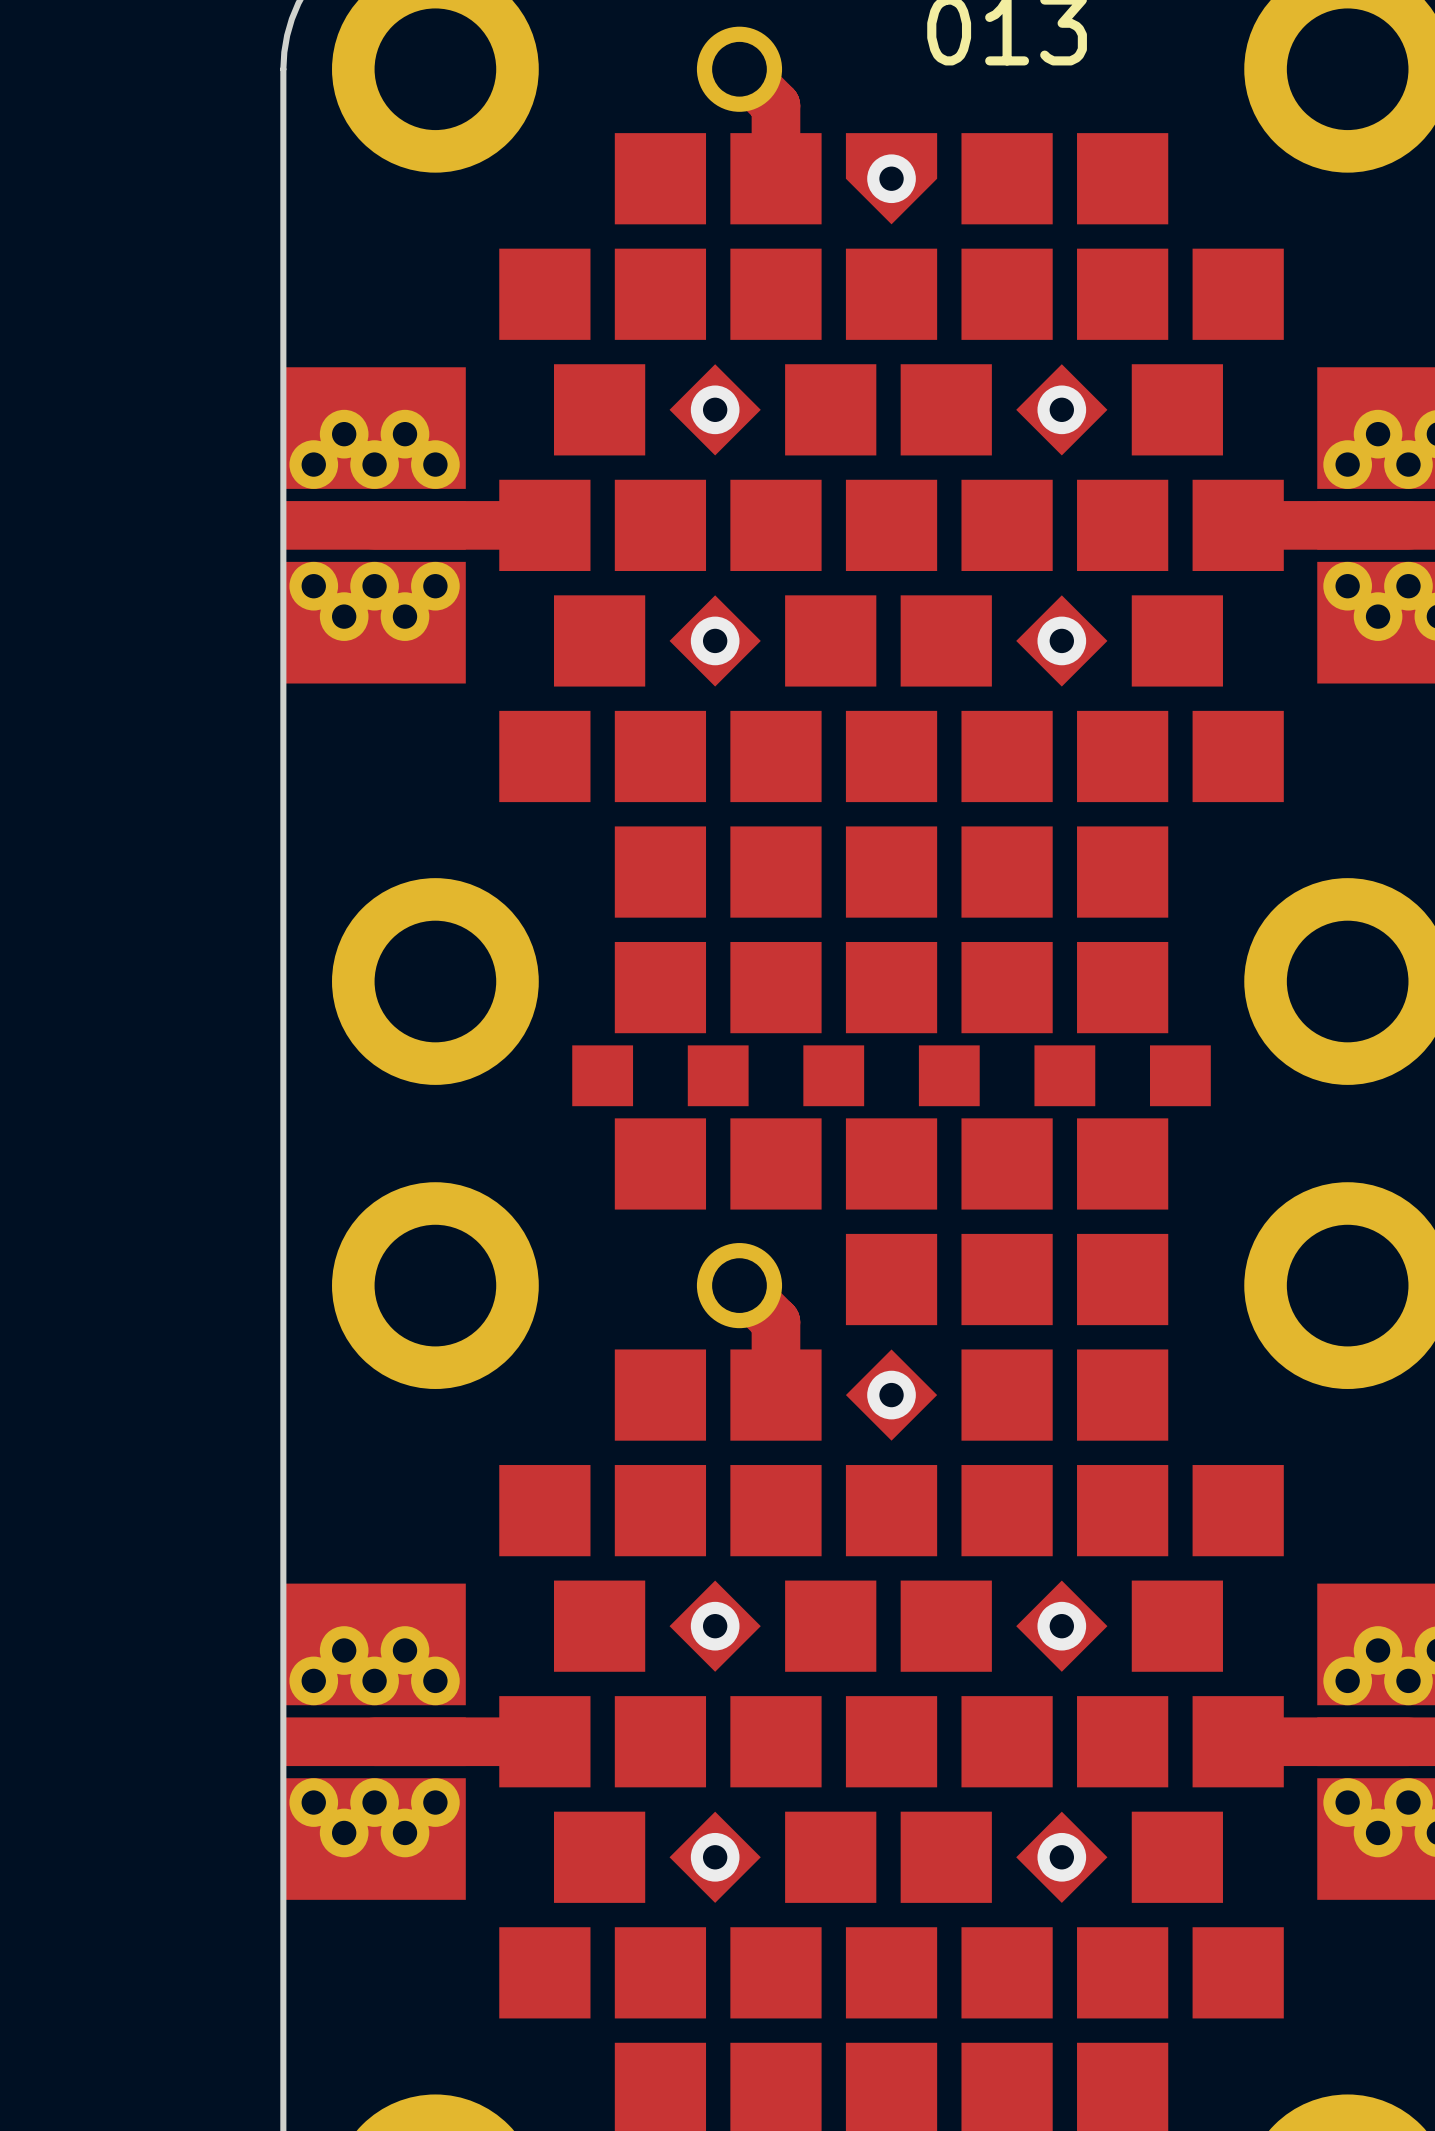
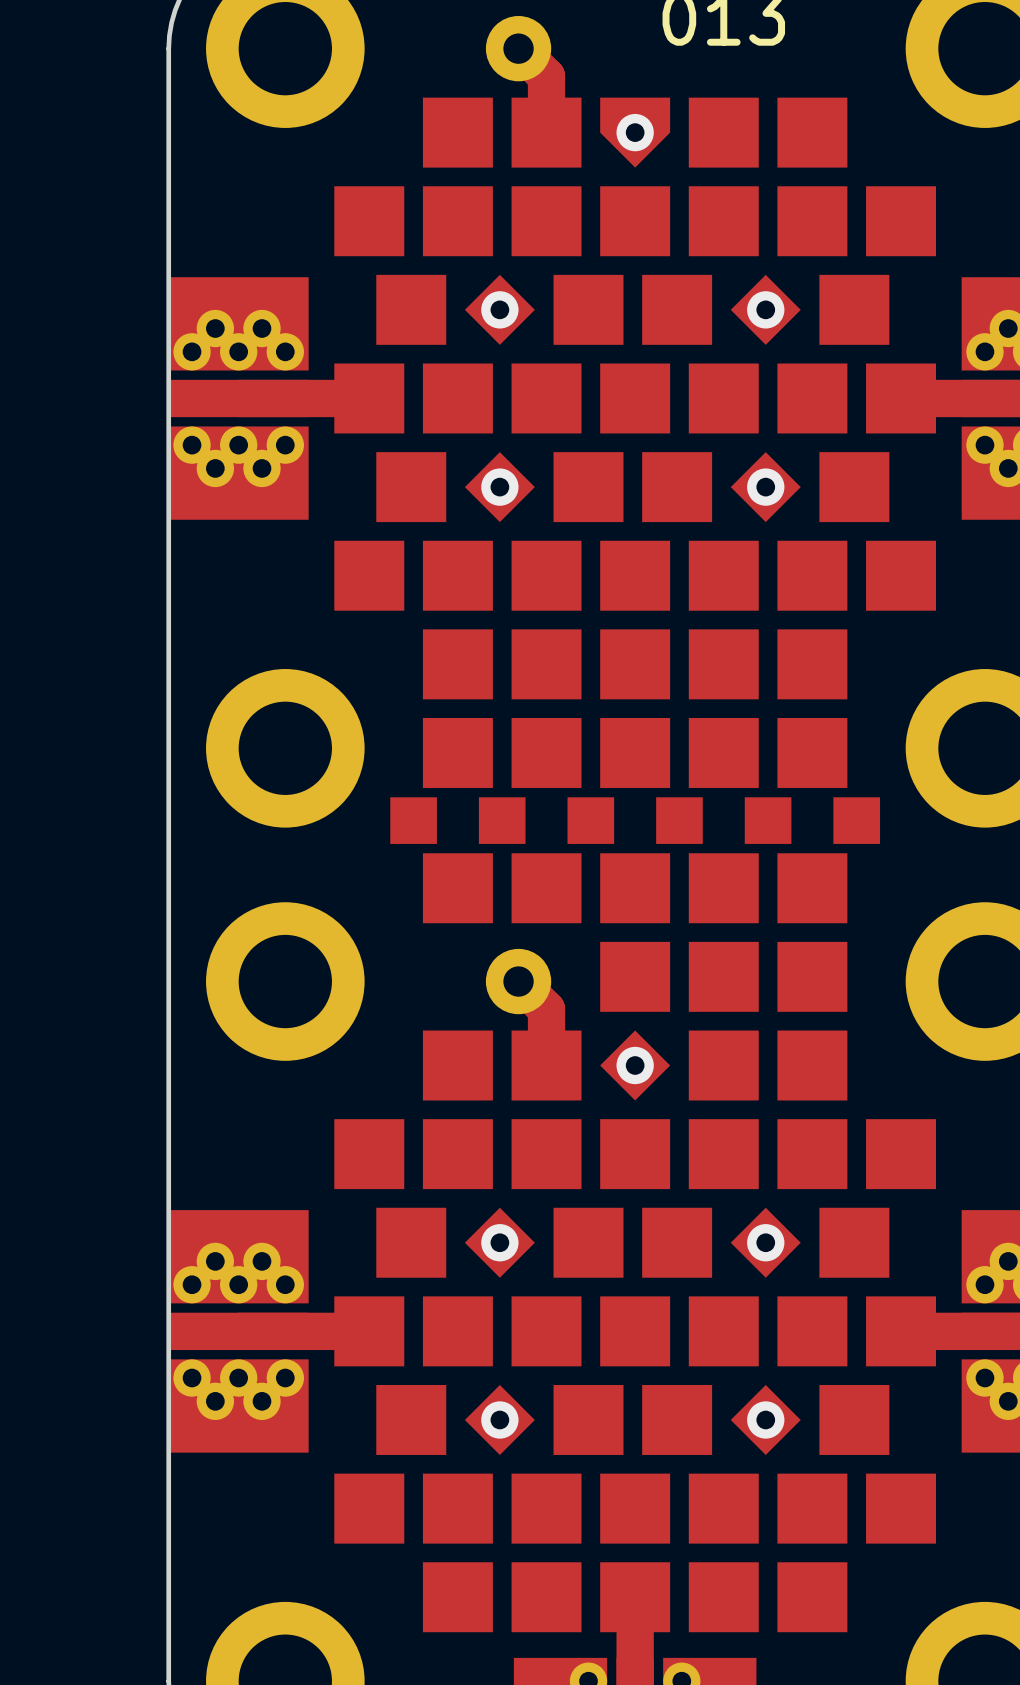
part footprint: [696, 26, 783, 112] -> [485, 16, 552, 82]
part footprint: [696, 1243, 783, 1329] -> [485, 948, 552, 1015]

